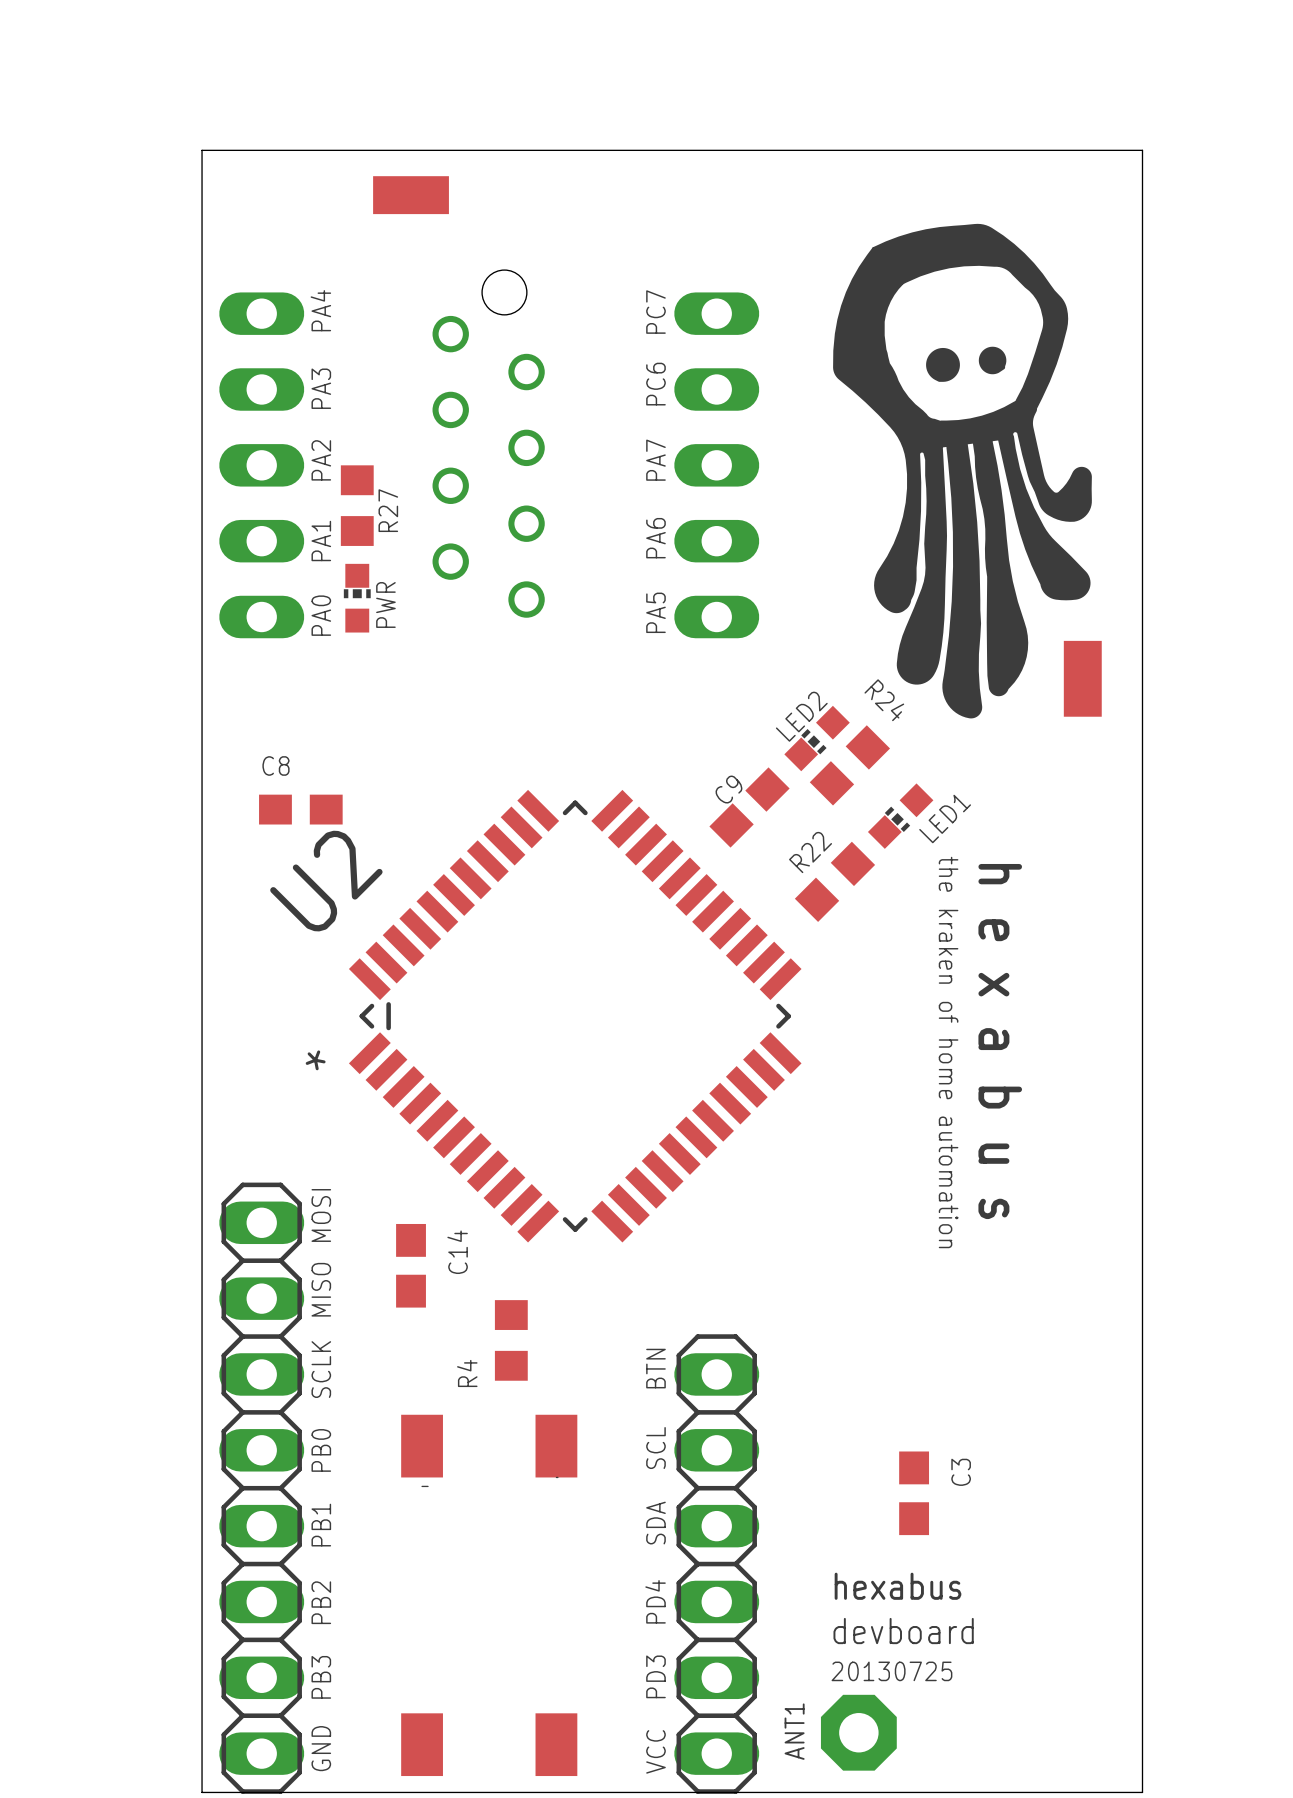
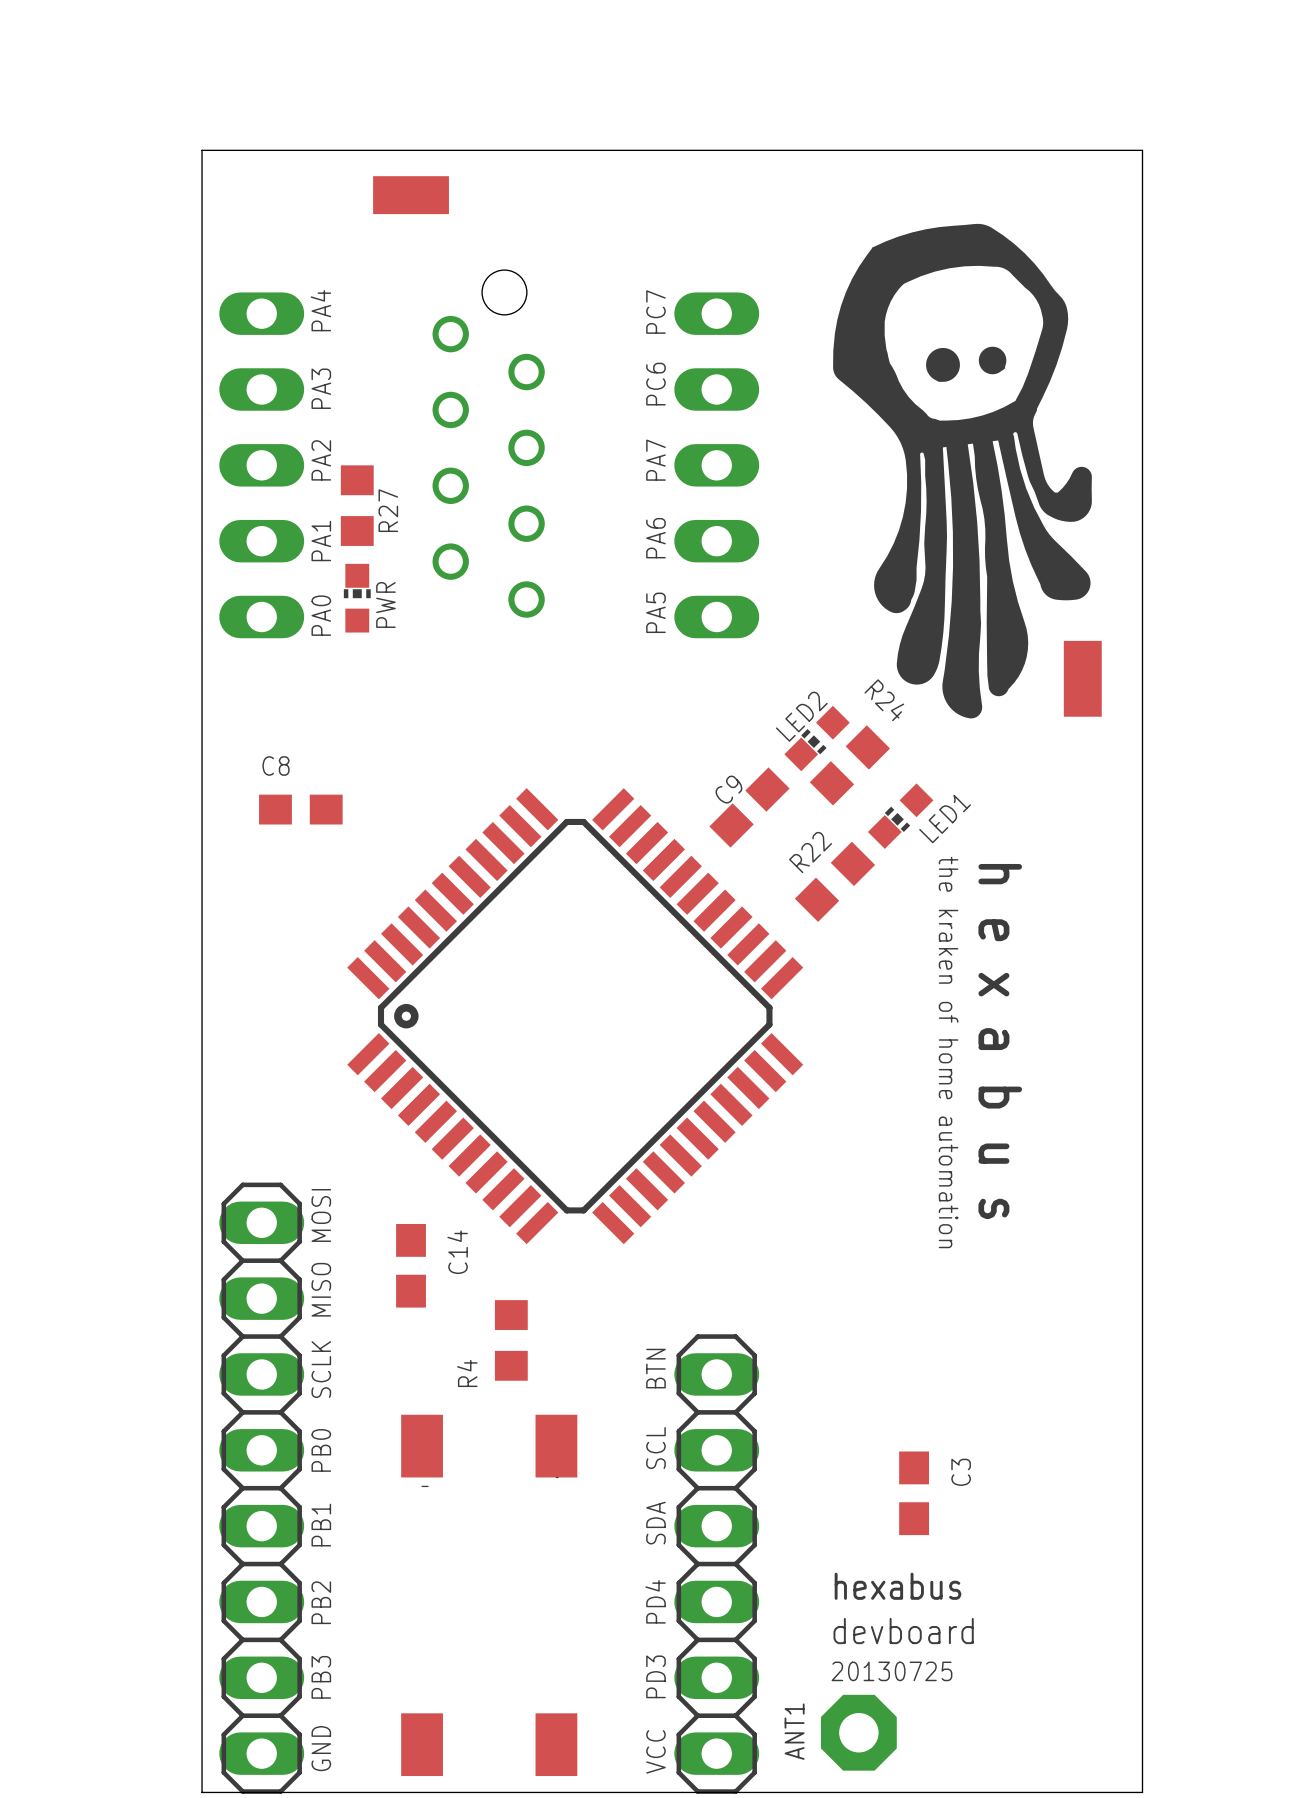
U2: (575, 1016) -> none
part: none -> (575, 1016)

